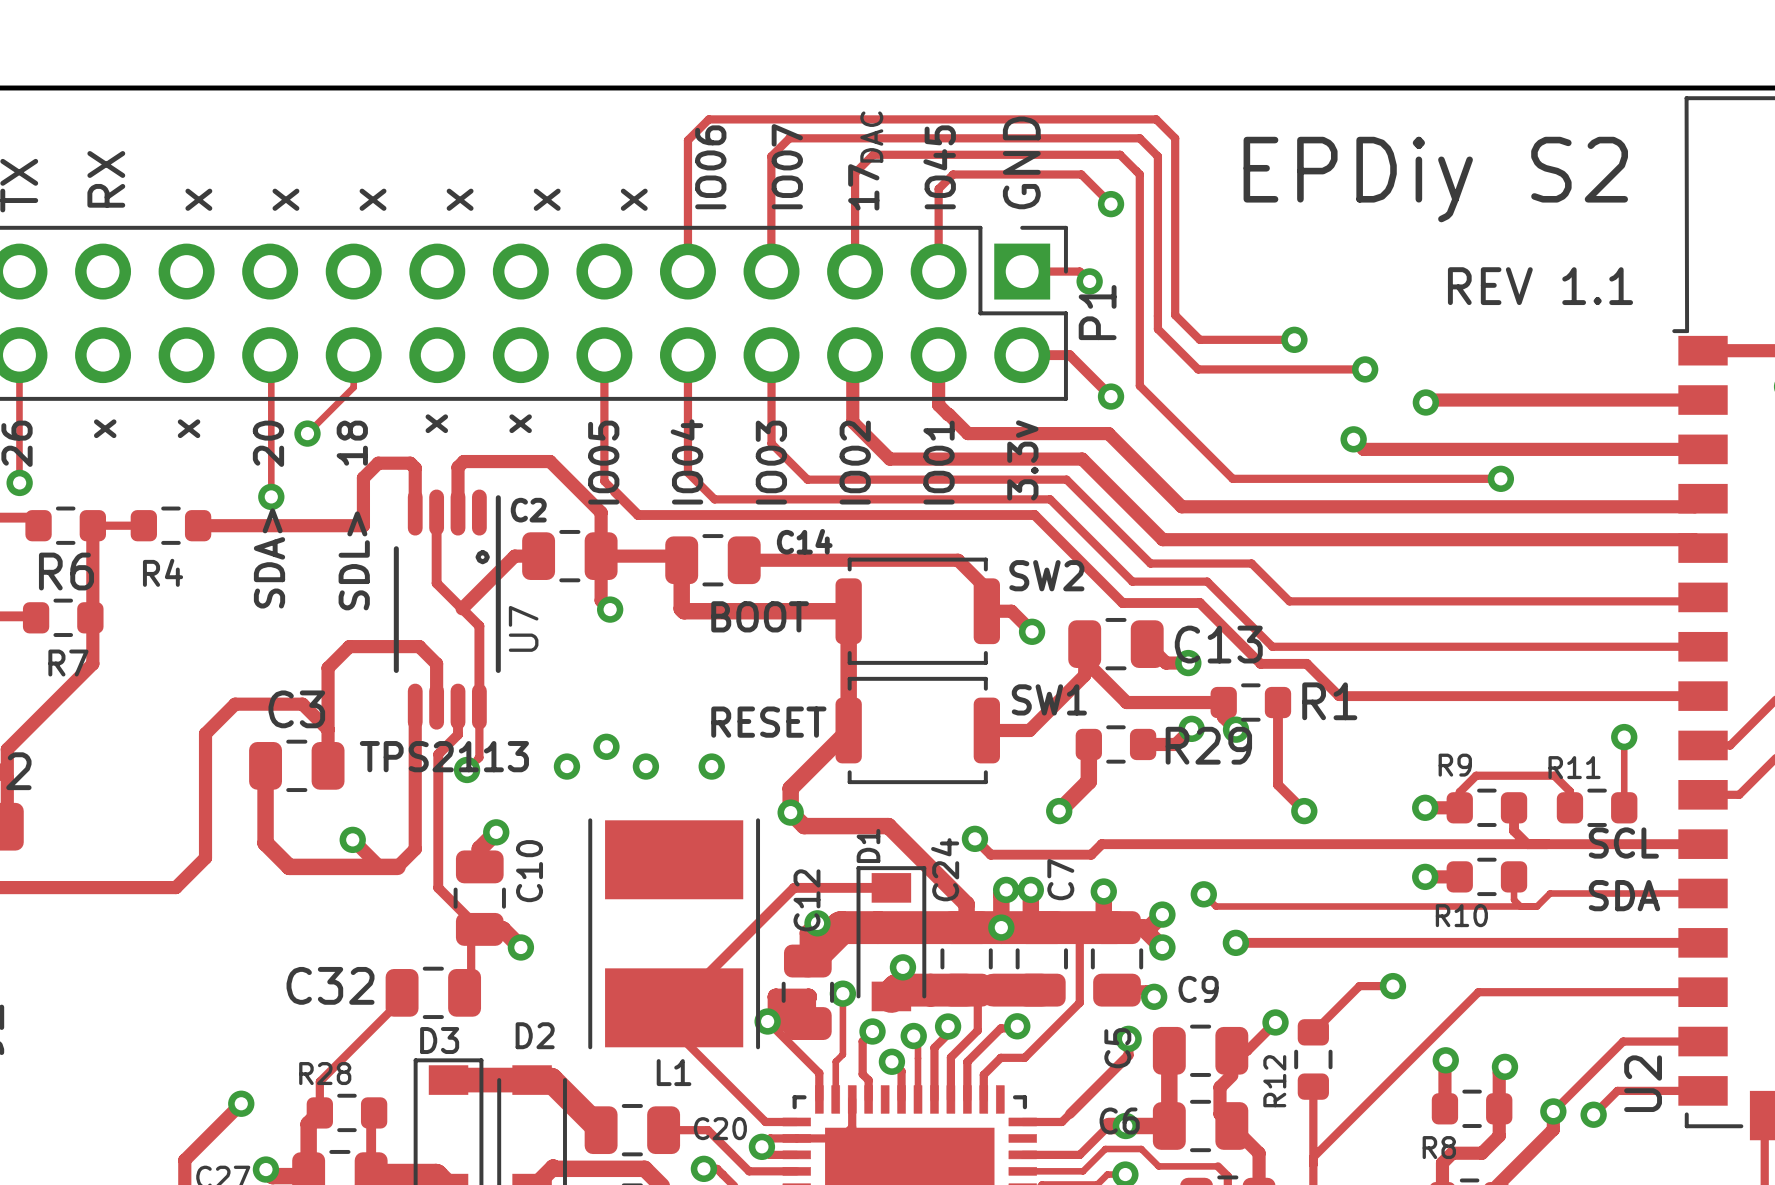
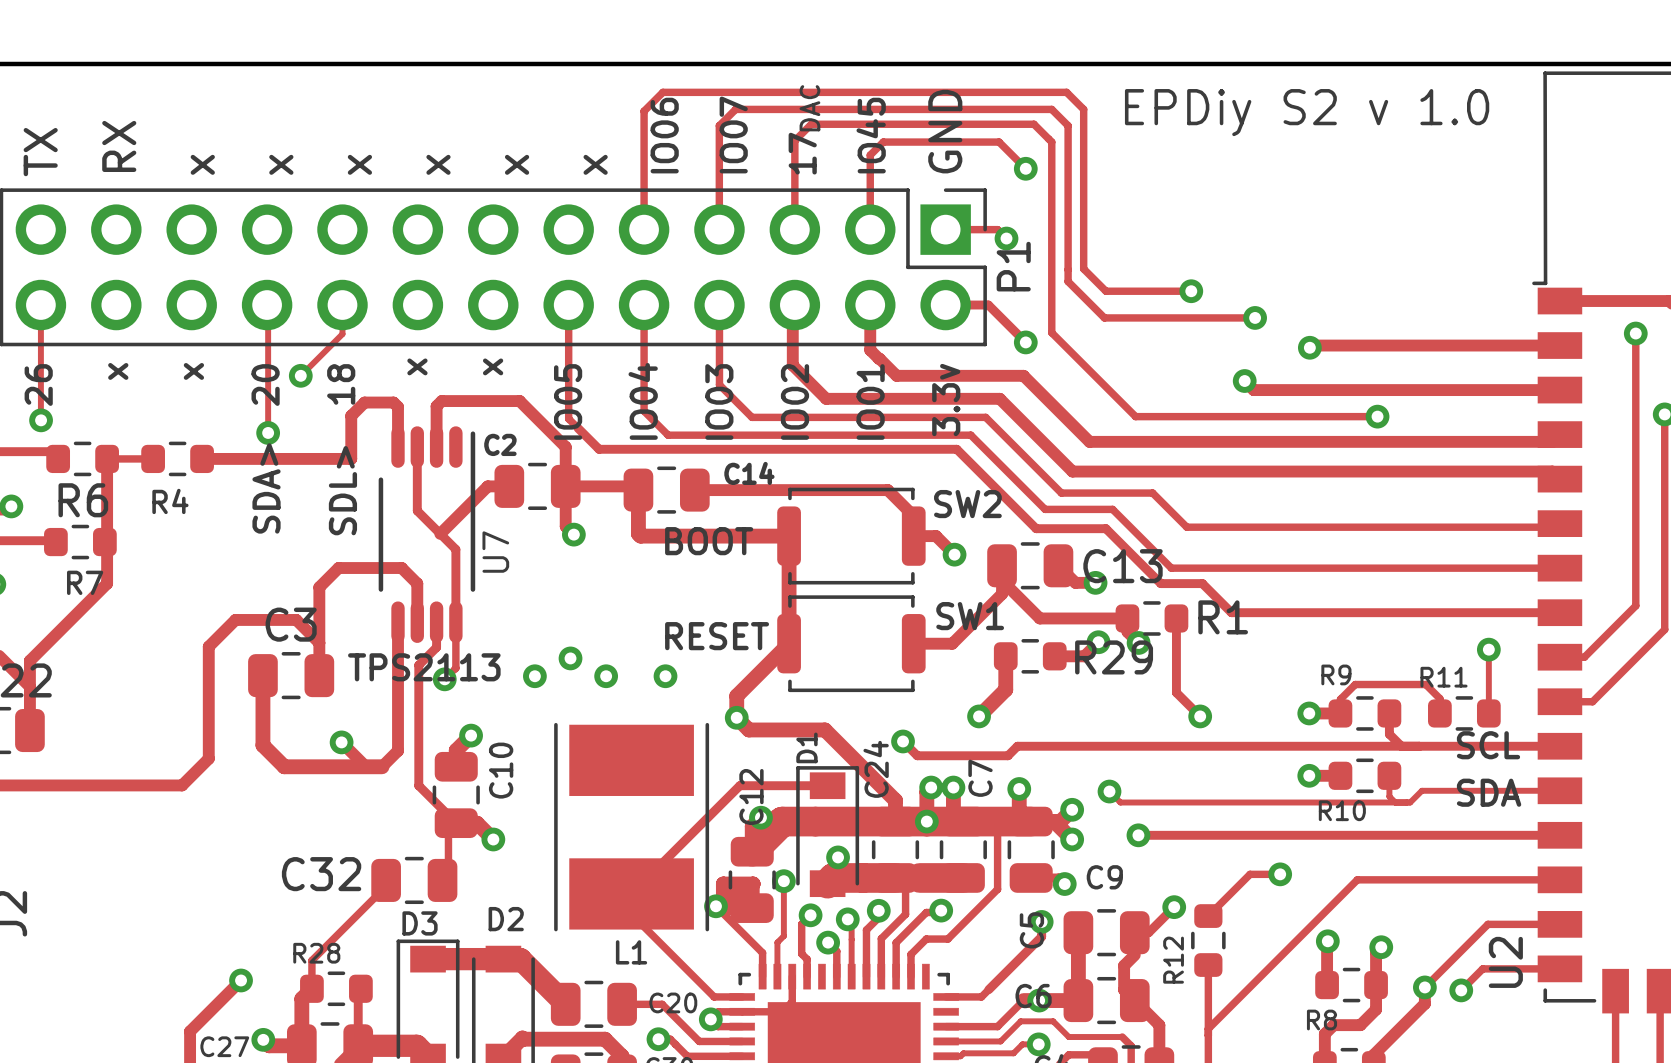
text: EPDiy S2 (1435, 179) -> EPDiy S2 v 1.0 (1307, 112)
text: REV 1.1 (1540, 286) -> none
text: ° (482, 557) -> none

